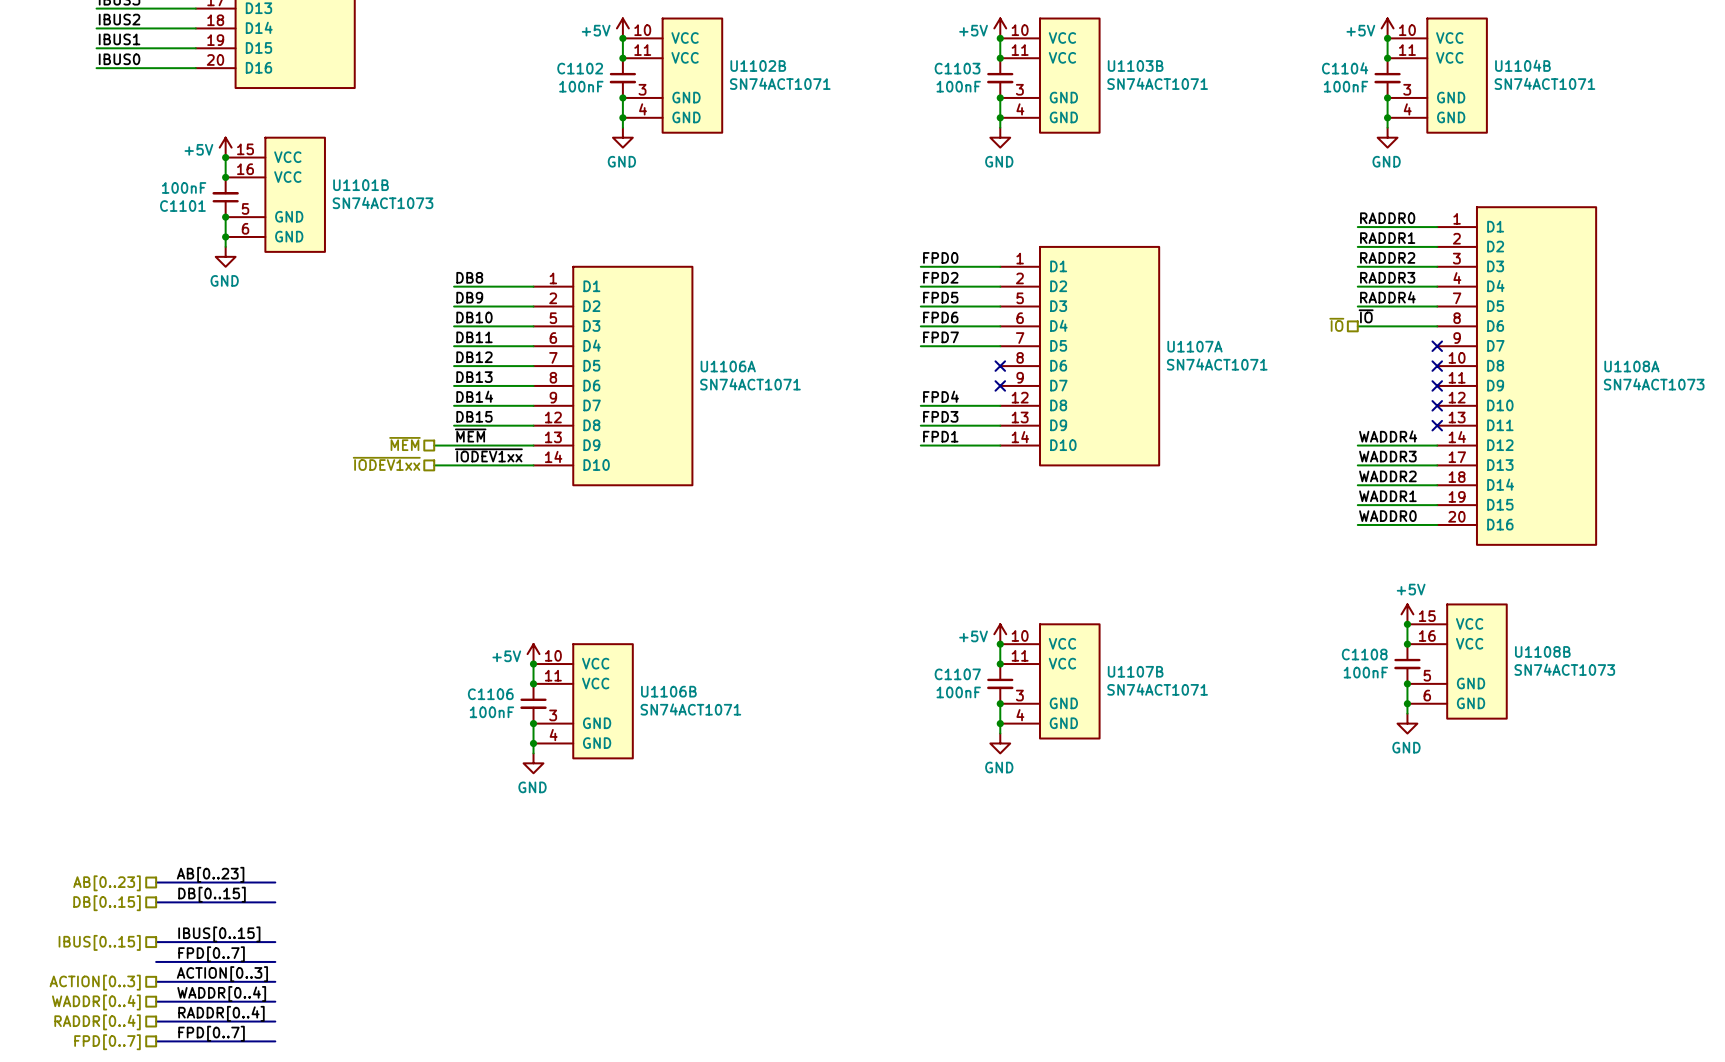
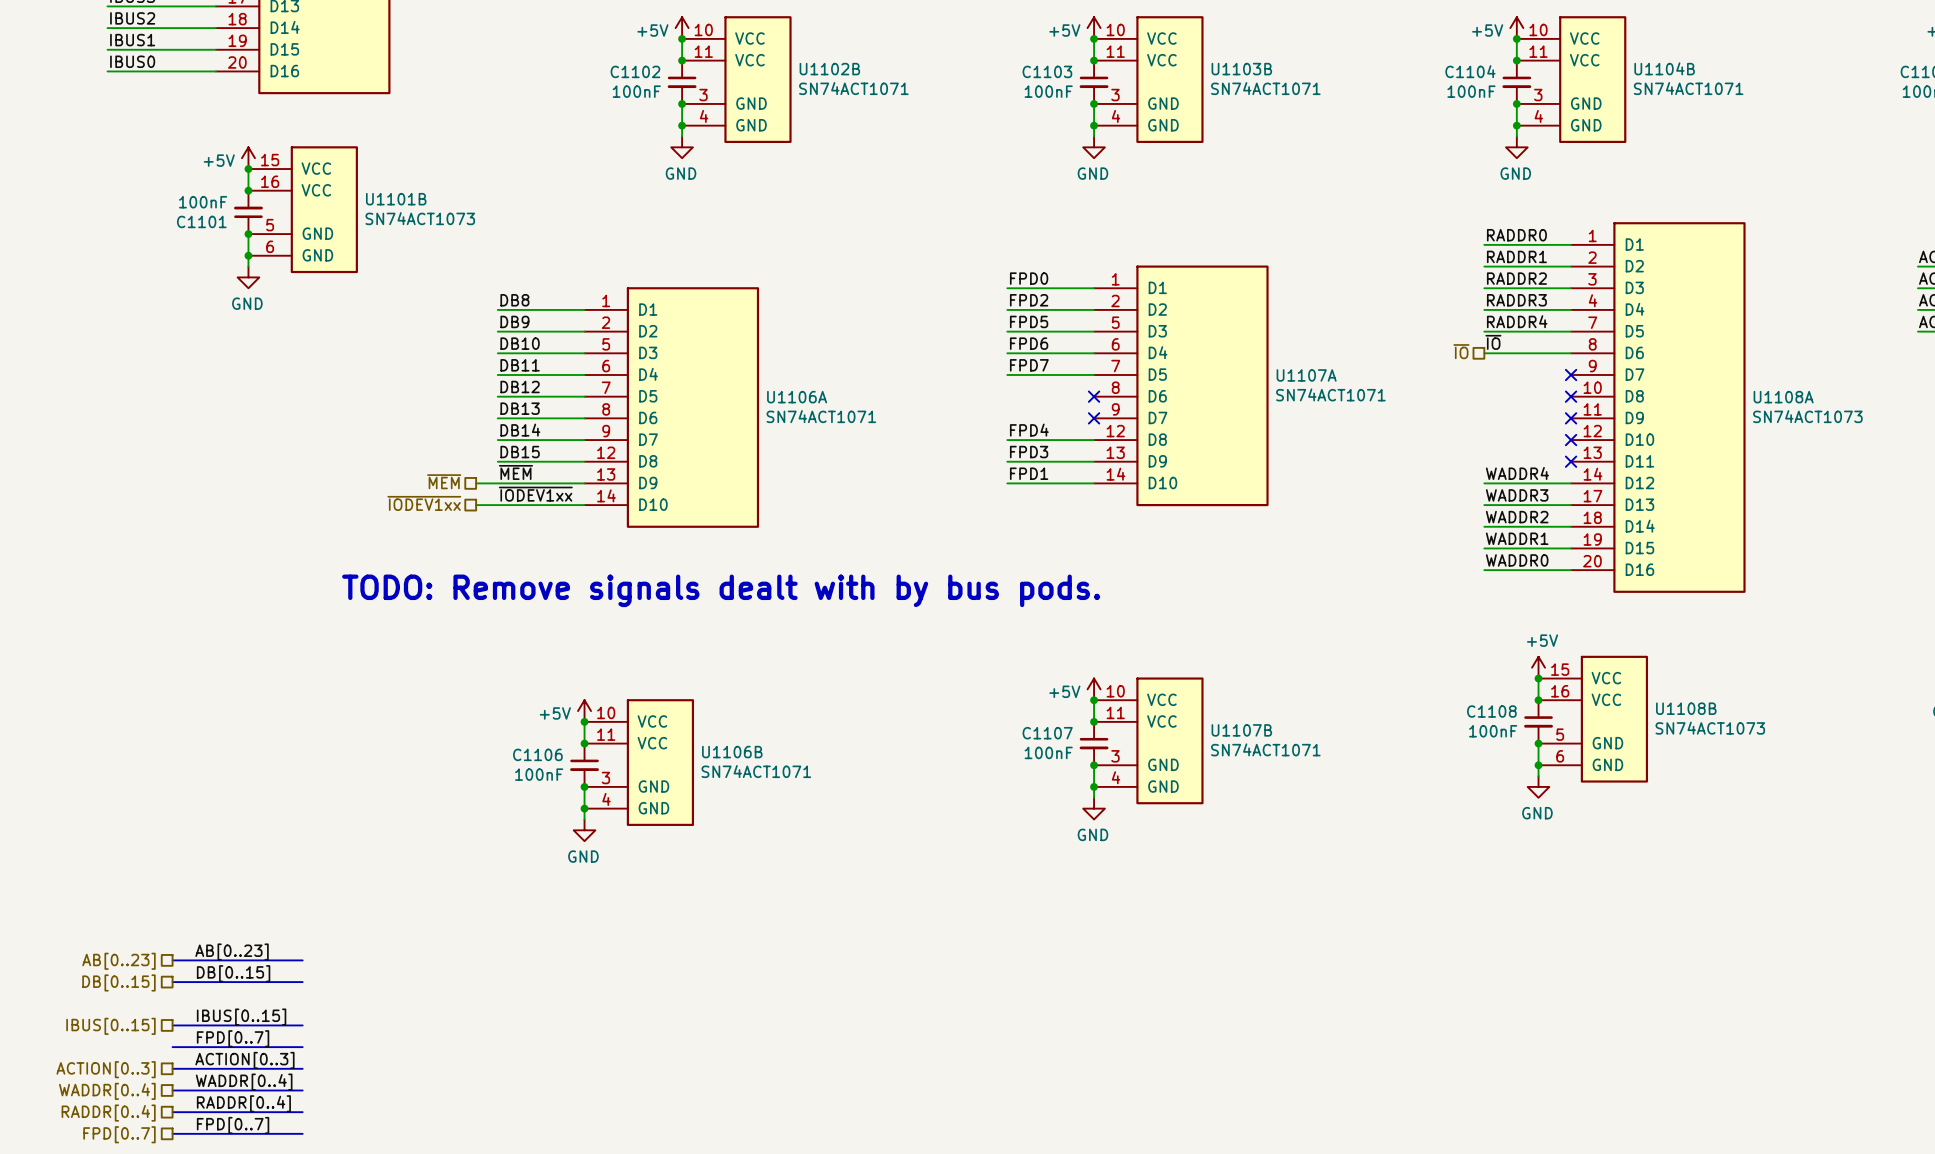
text: none -> TODO: Remove signals dealt with by bus pods. (721, 590)

